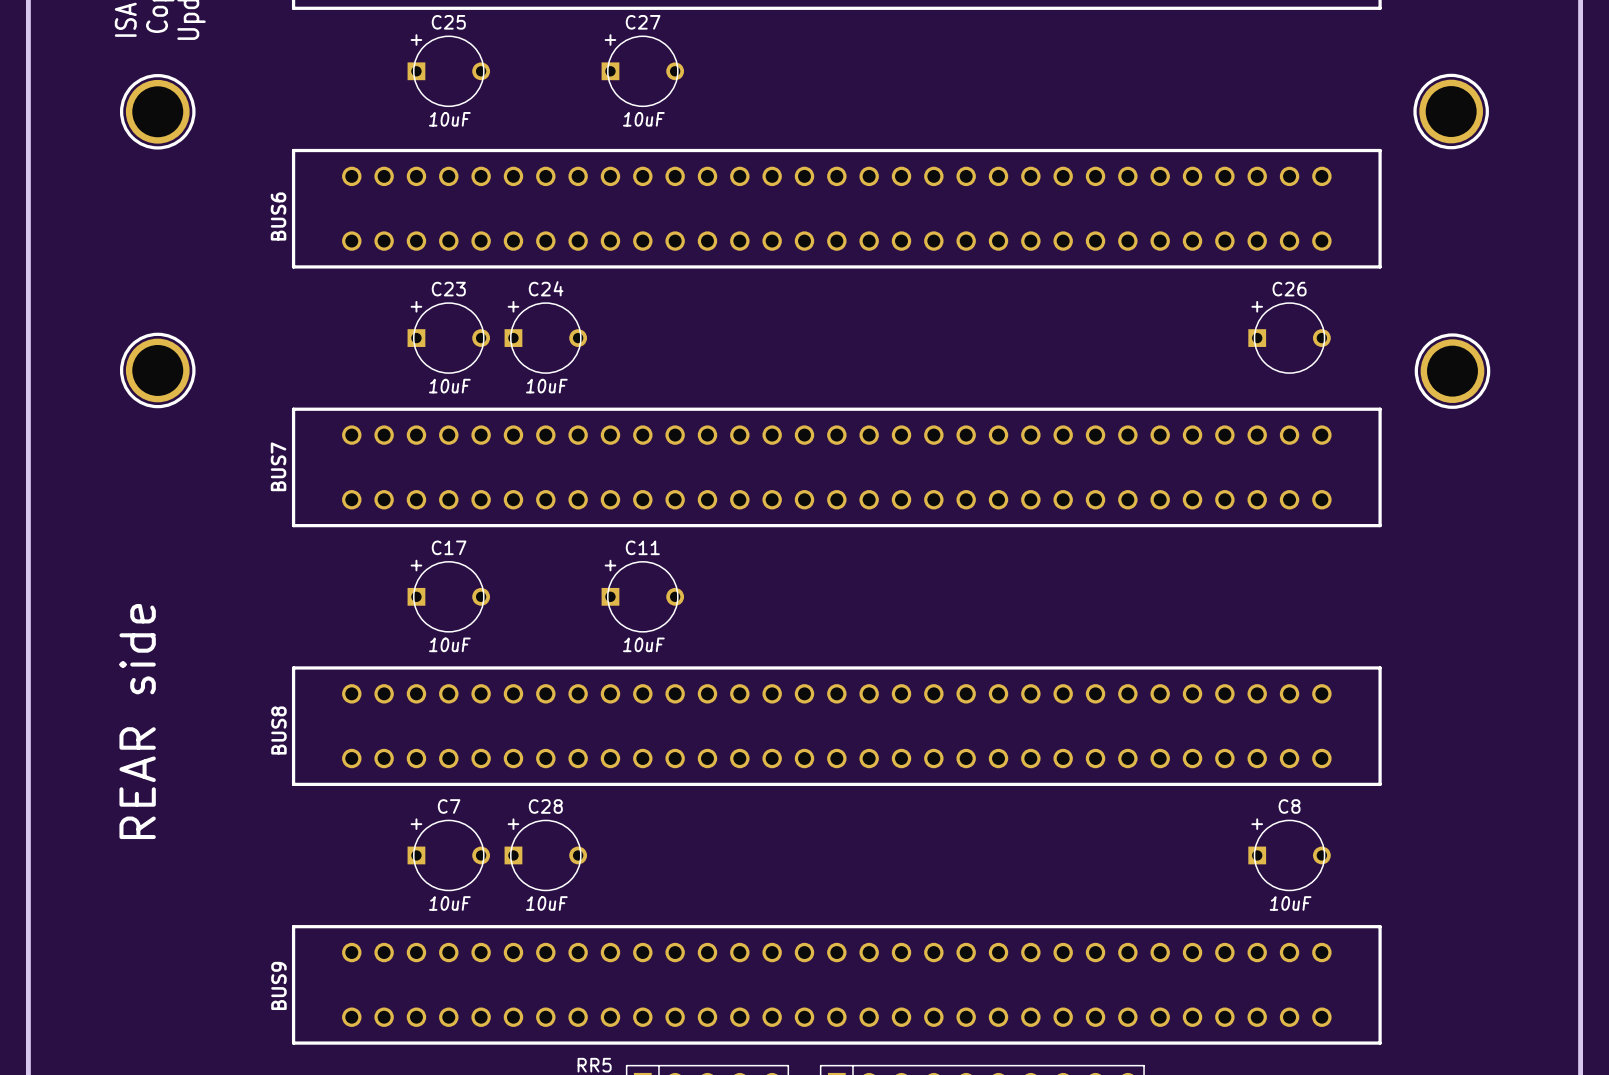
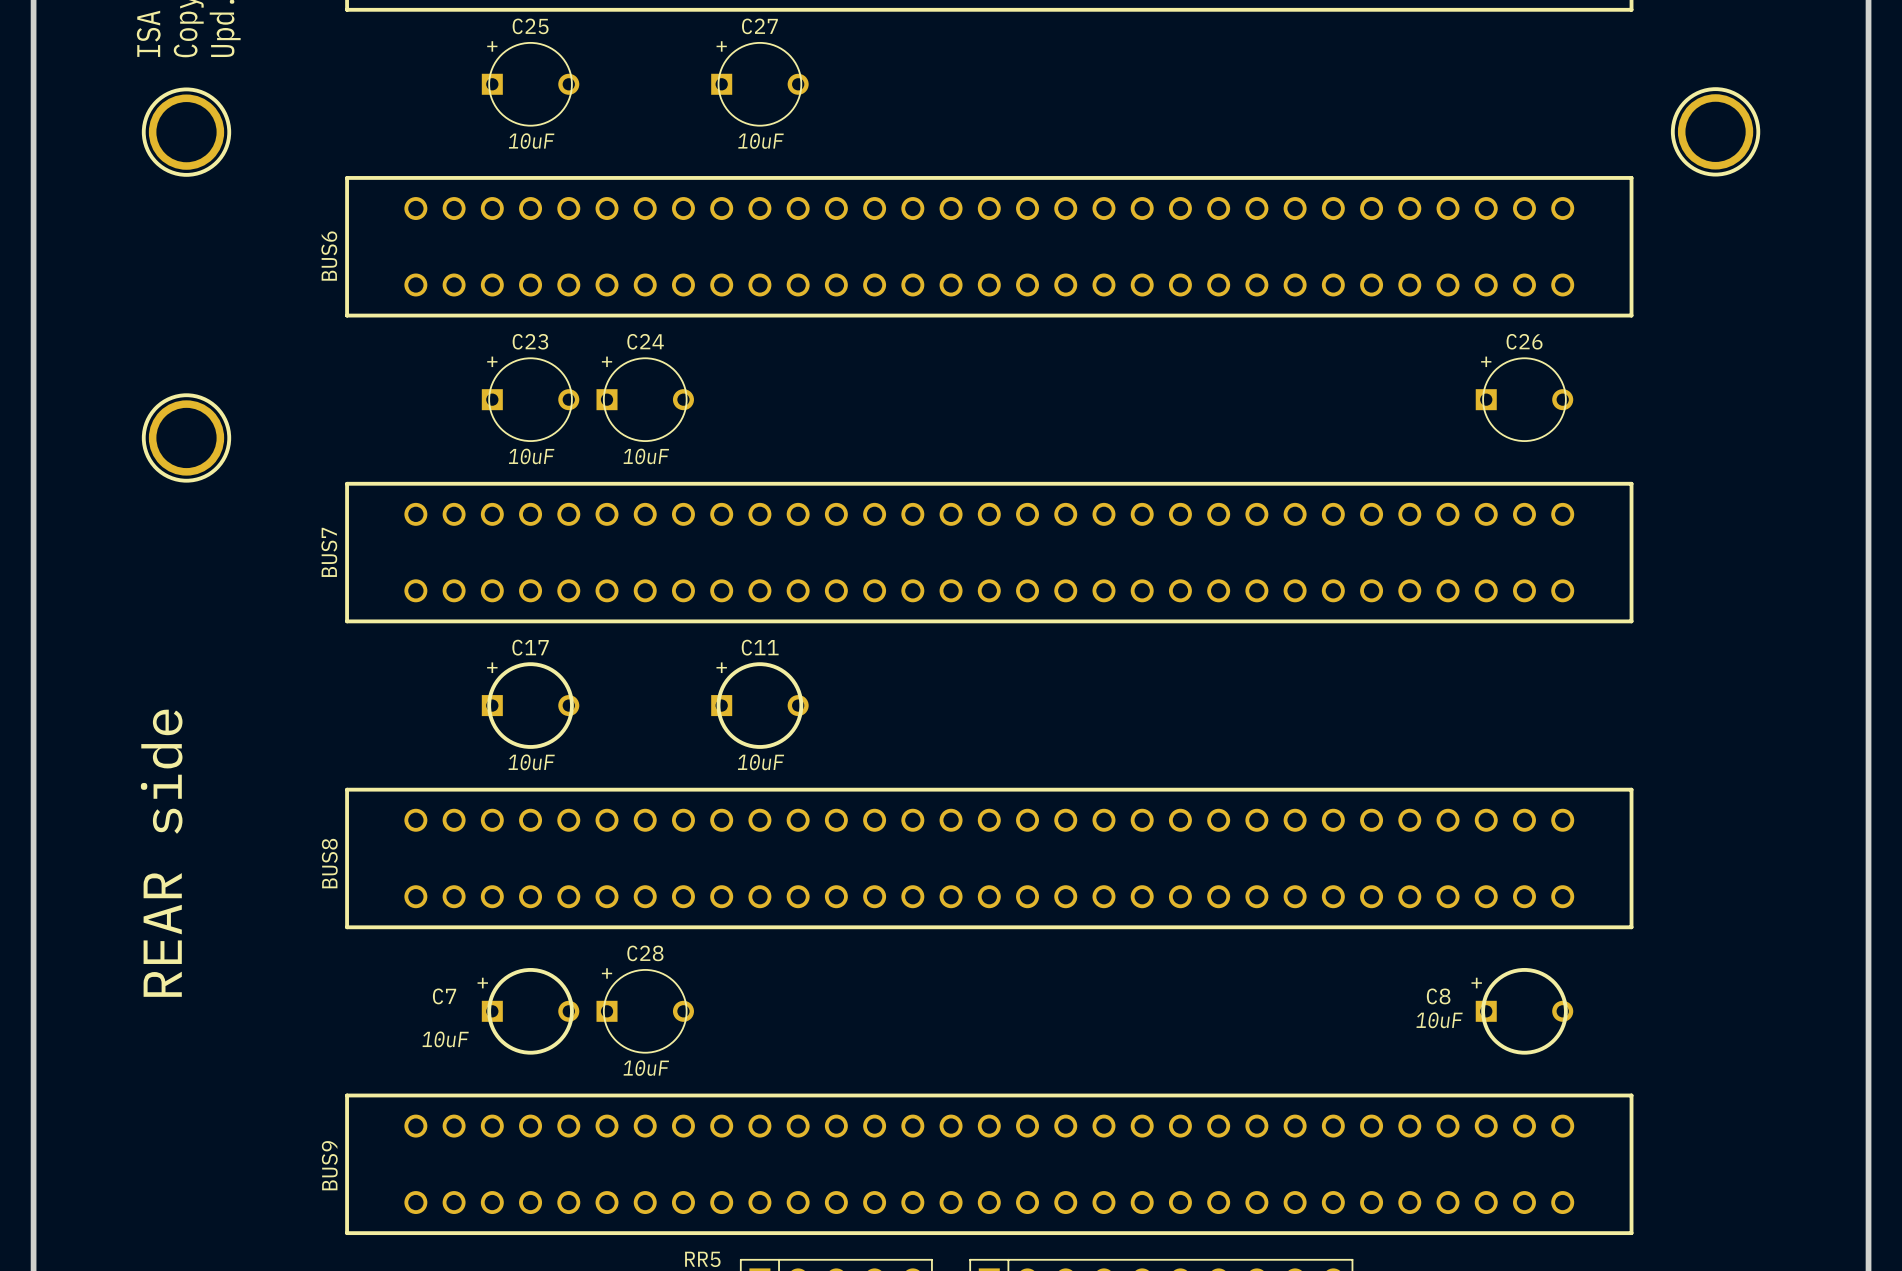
part: (1452, 371) -> none
C17 footprint: [407, 561, 491, 633] -> [481, 662, 580, 749]
C11 footprint: [601, 561, 685, 633] -> [711, 662, 809, 749]
C7 name position: C7 (449, 806) -> C7 (444, 996)
C8 name position: C8 (1289, 806) -> C8 (1438, 996)
C7 footprint: [407, 819, 491, 892] -> [481, 968, 580, 1055]
C8 footprint: [1248, 819, 1331, 892] -> [1475, 968, 1574, 1055]
C7 value position: 10uF (449, 903) -> 10uF (445, 1039)
C8 value position: 10uF (1290, 903) -> 10uF (1439, 1020)

